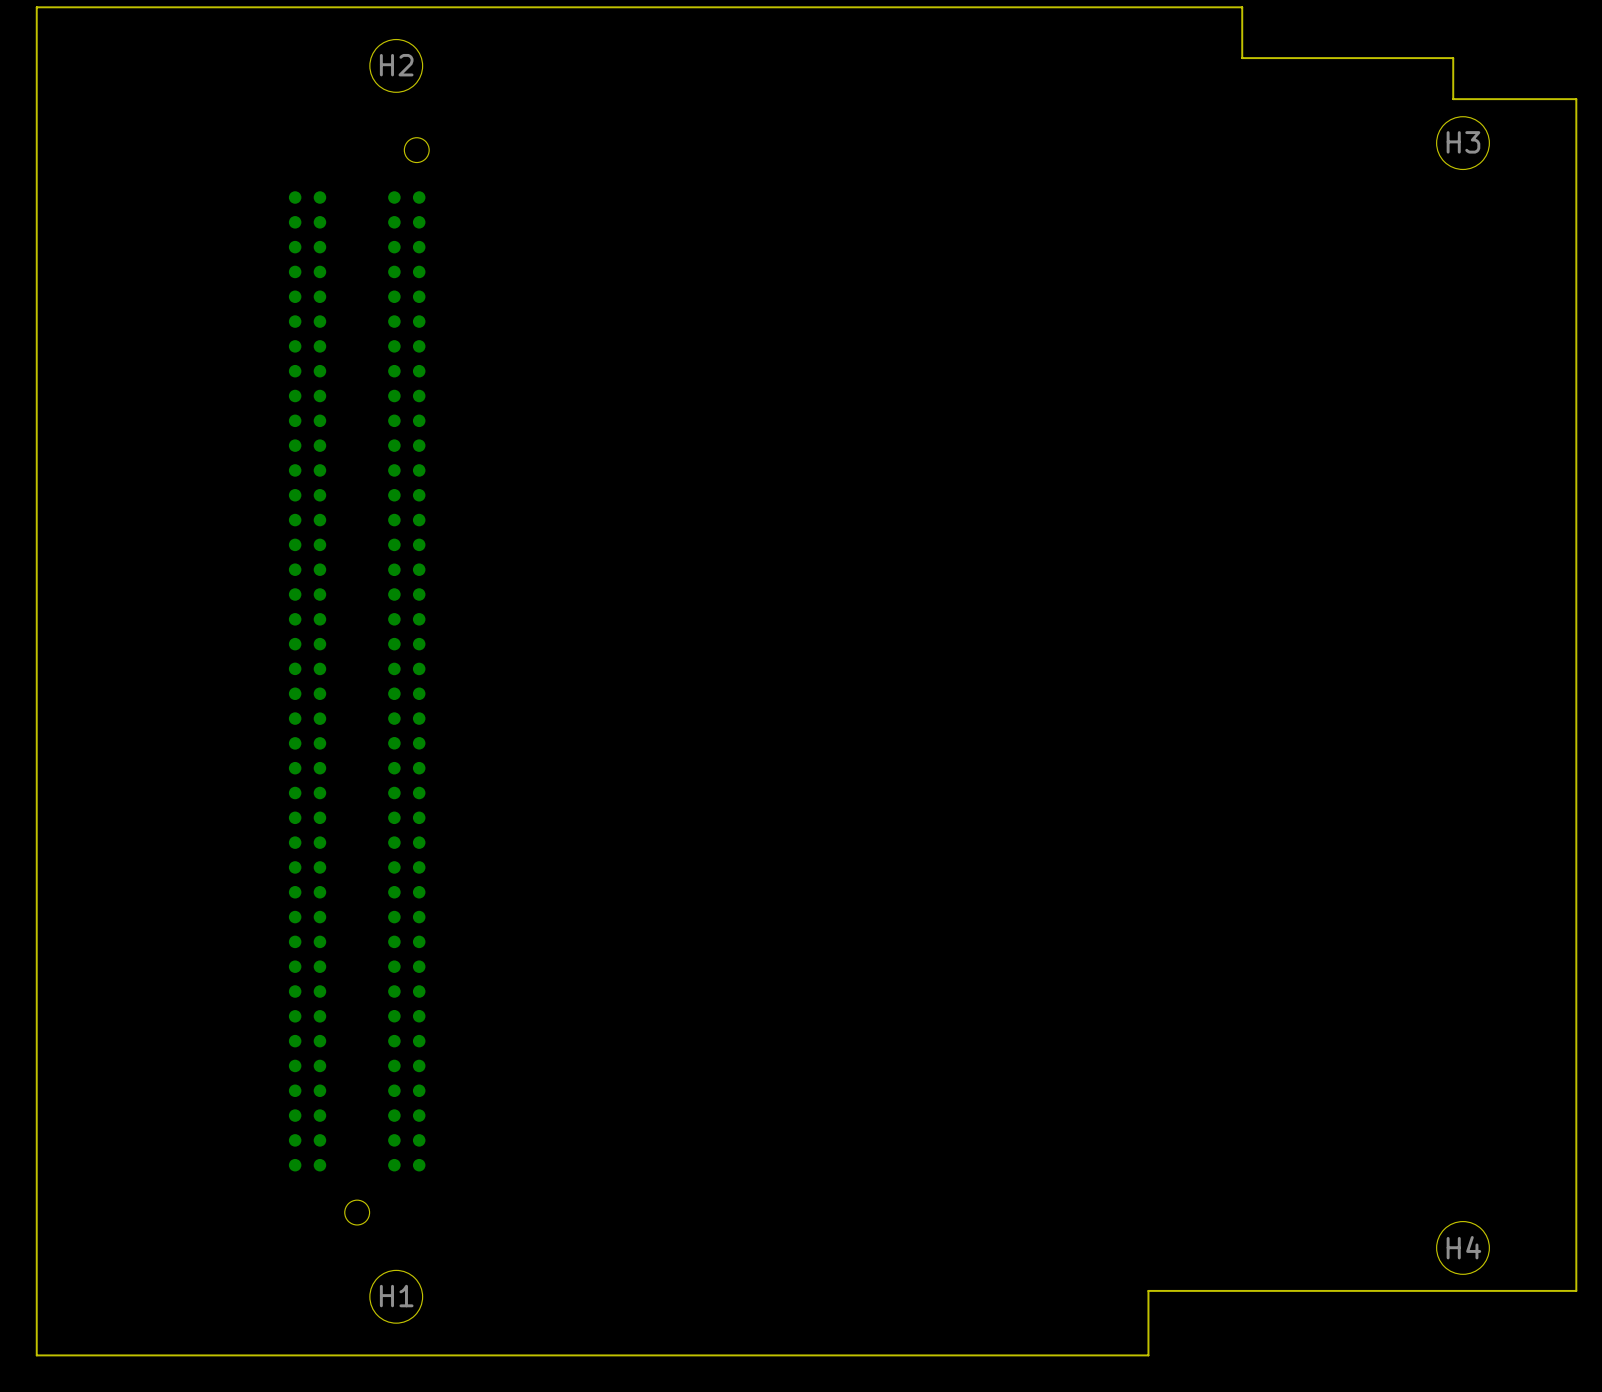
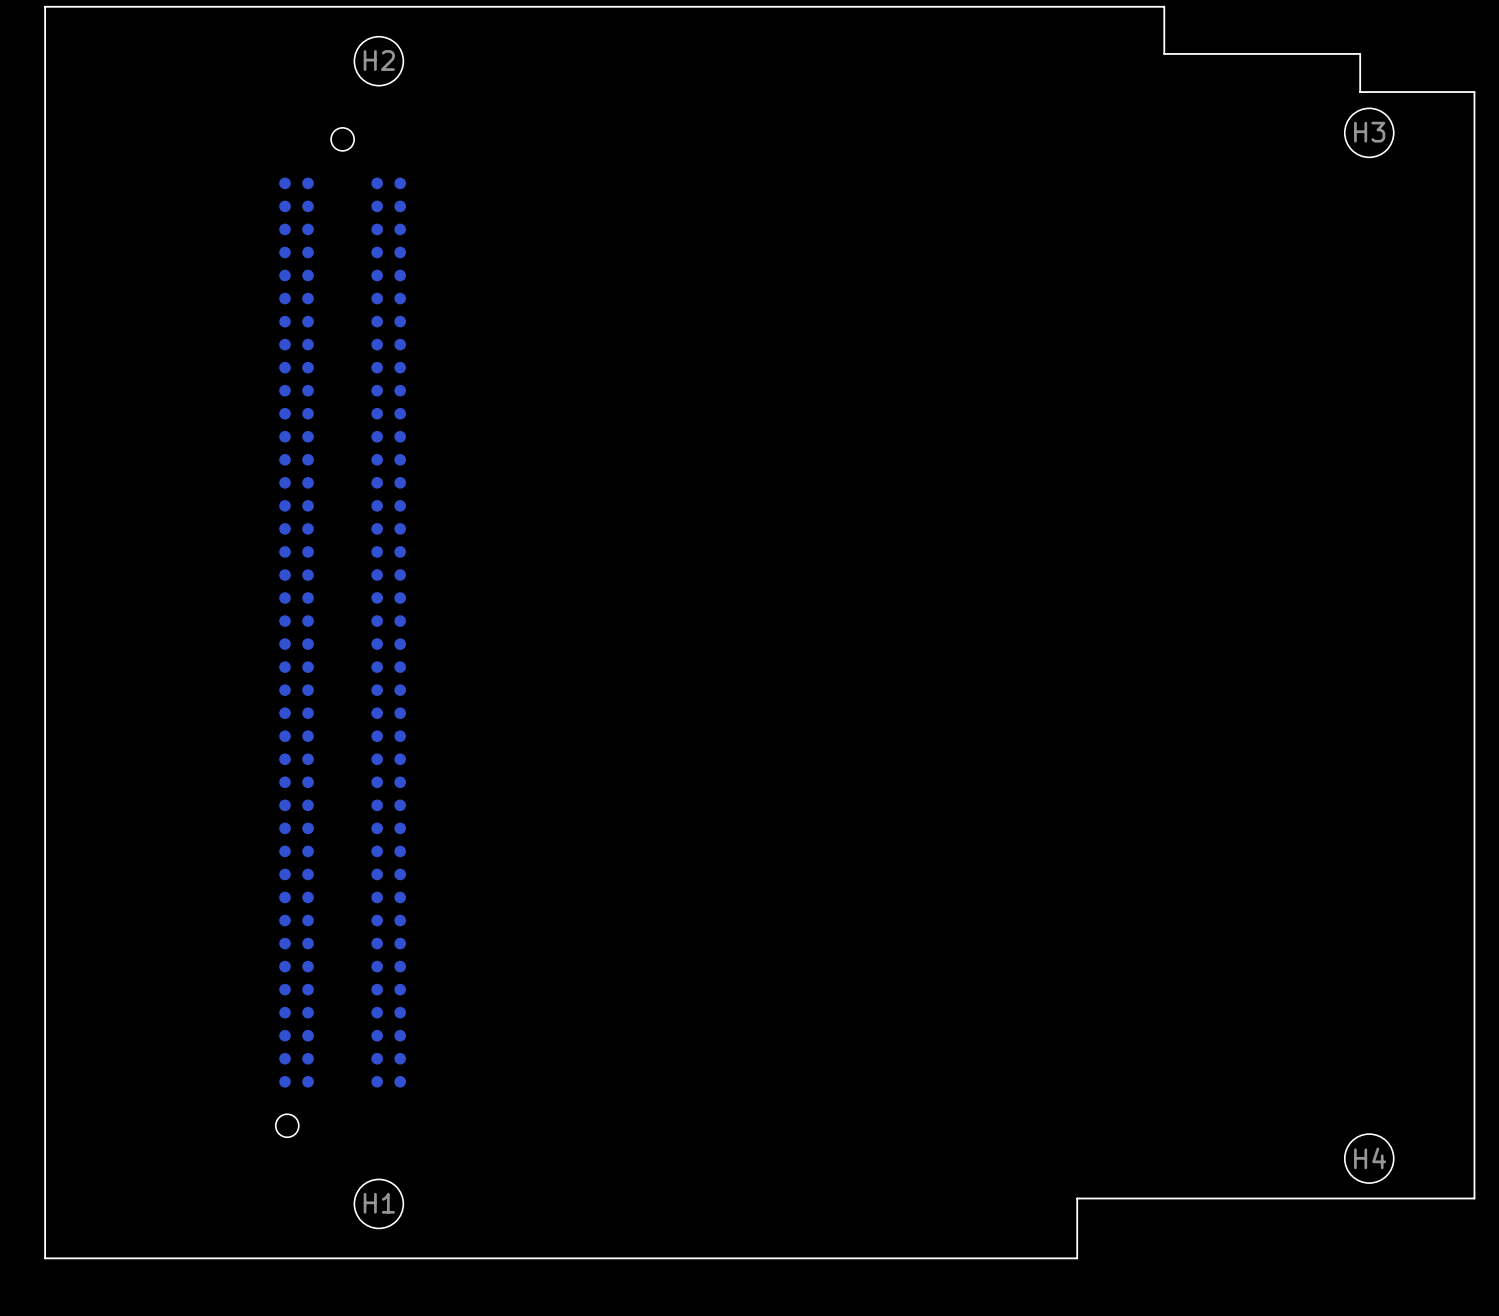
part rotation: 0° (359, 681) -> 180° (340, 632)

